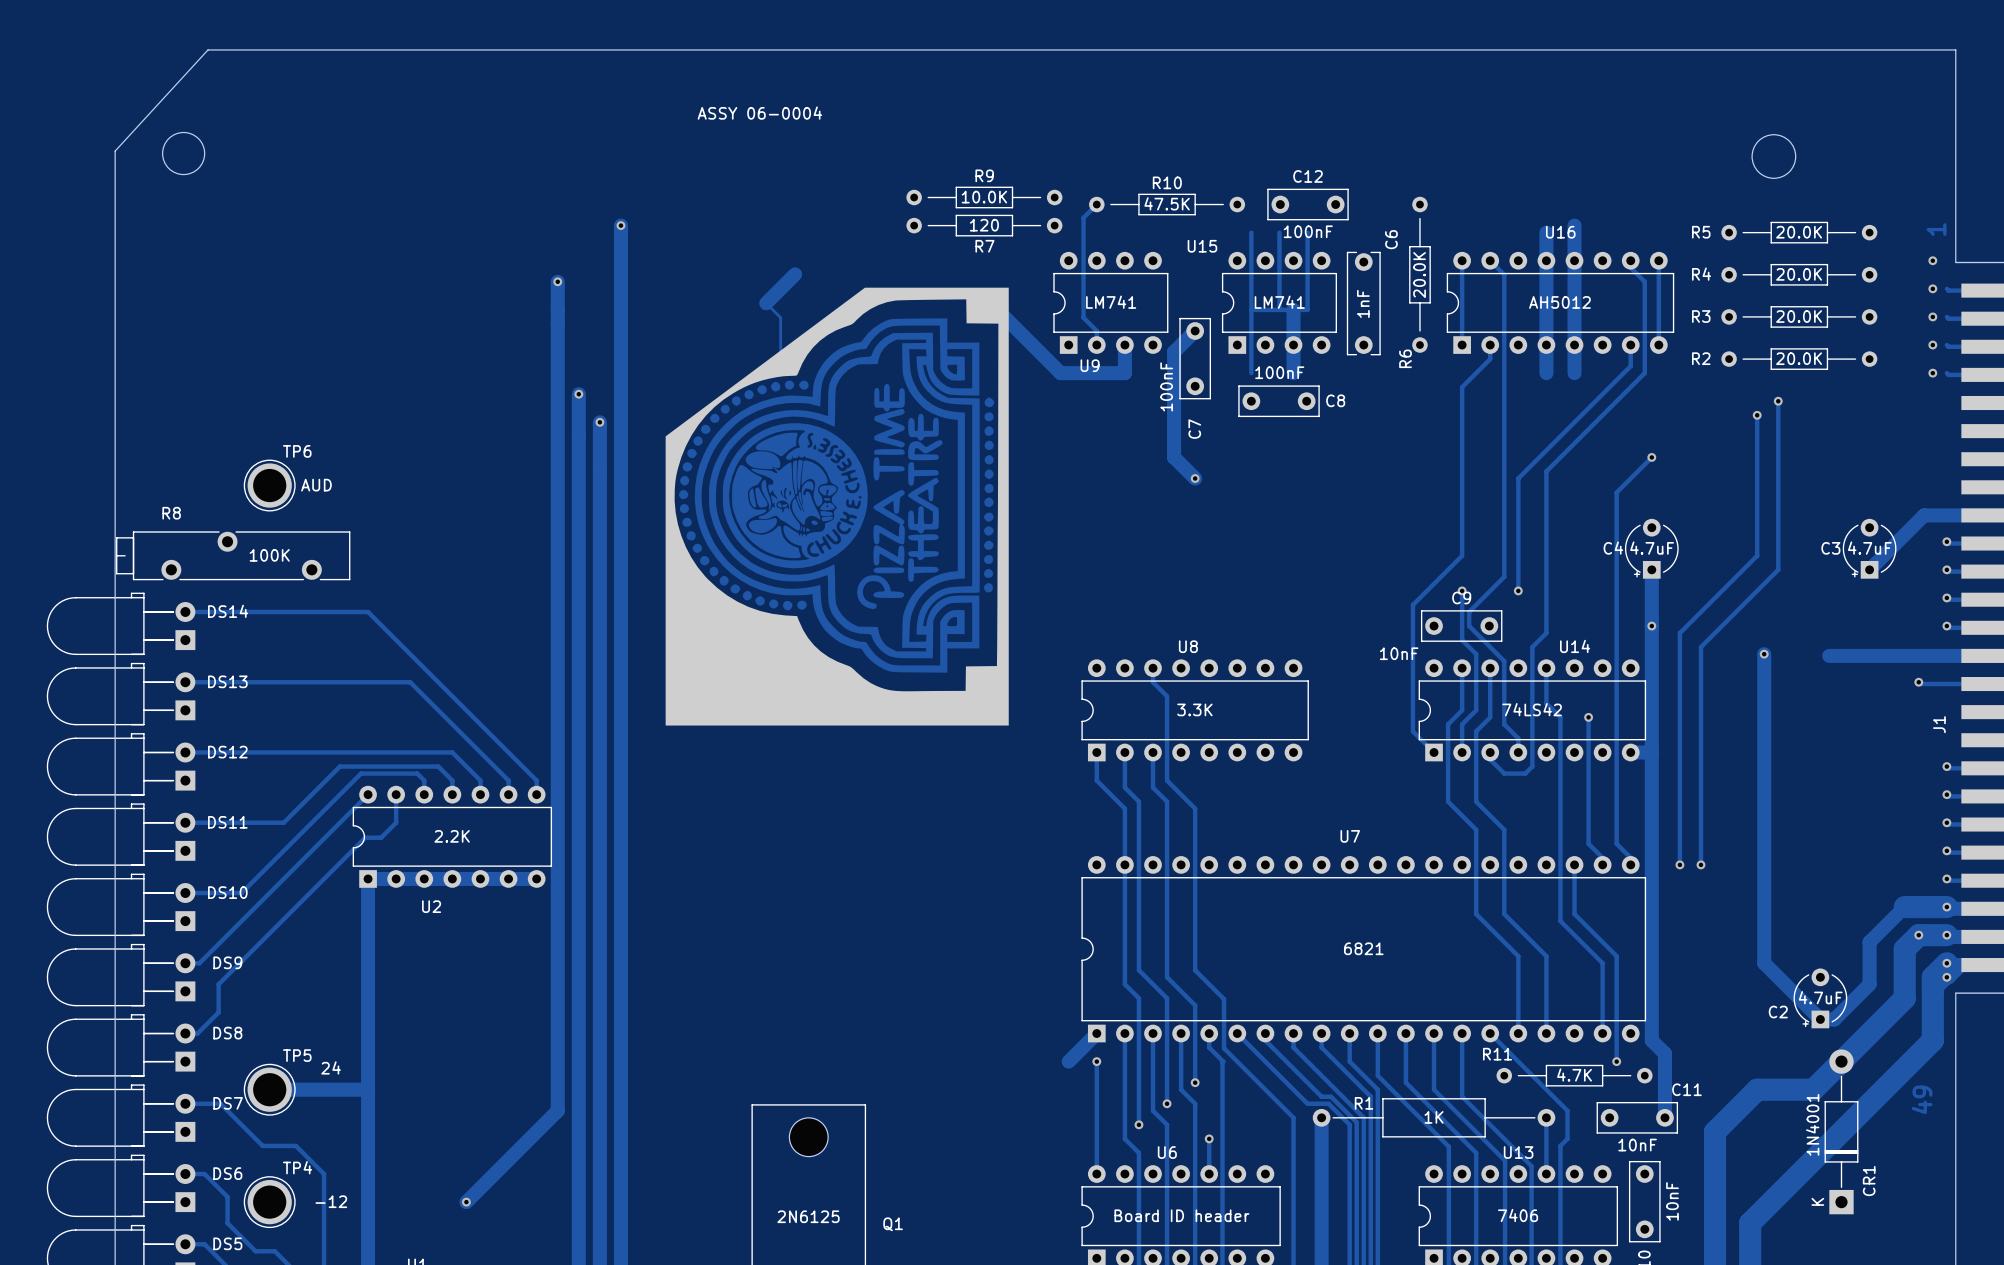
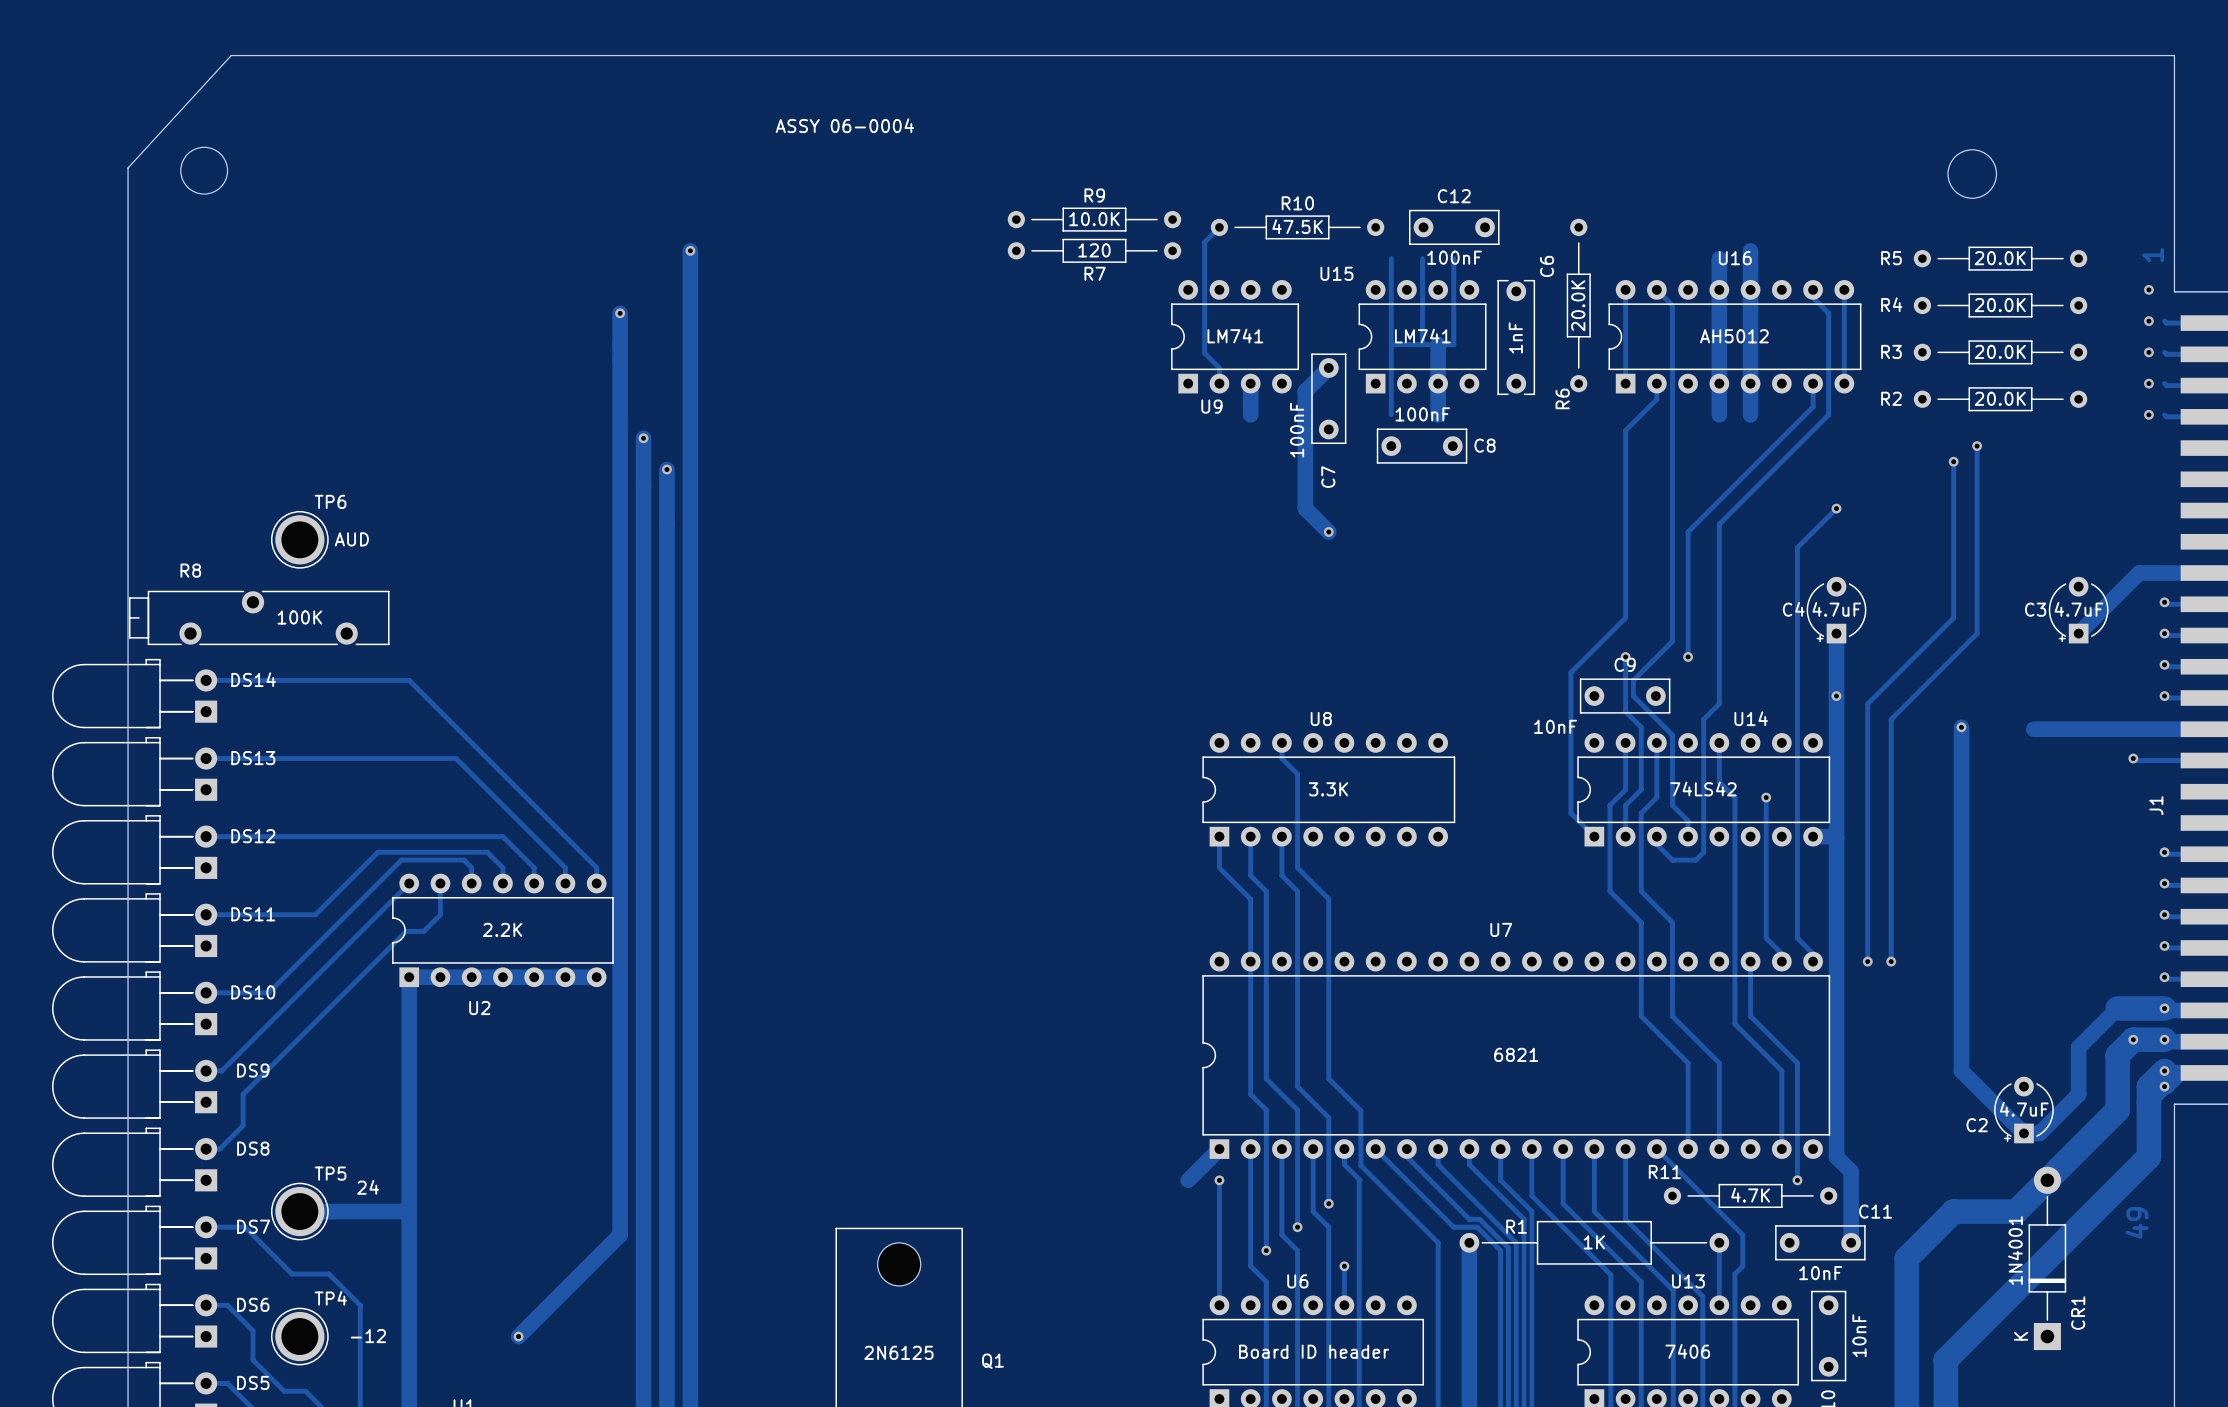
track: (795, 274) (766, 303) (780, 317) (780, 366) -> none
track: (1003, 316) (1060, 373) (1124, 373) -> none
part: (837, 506) -> none

